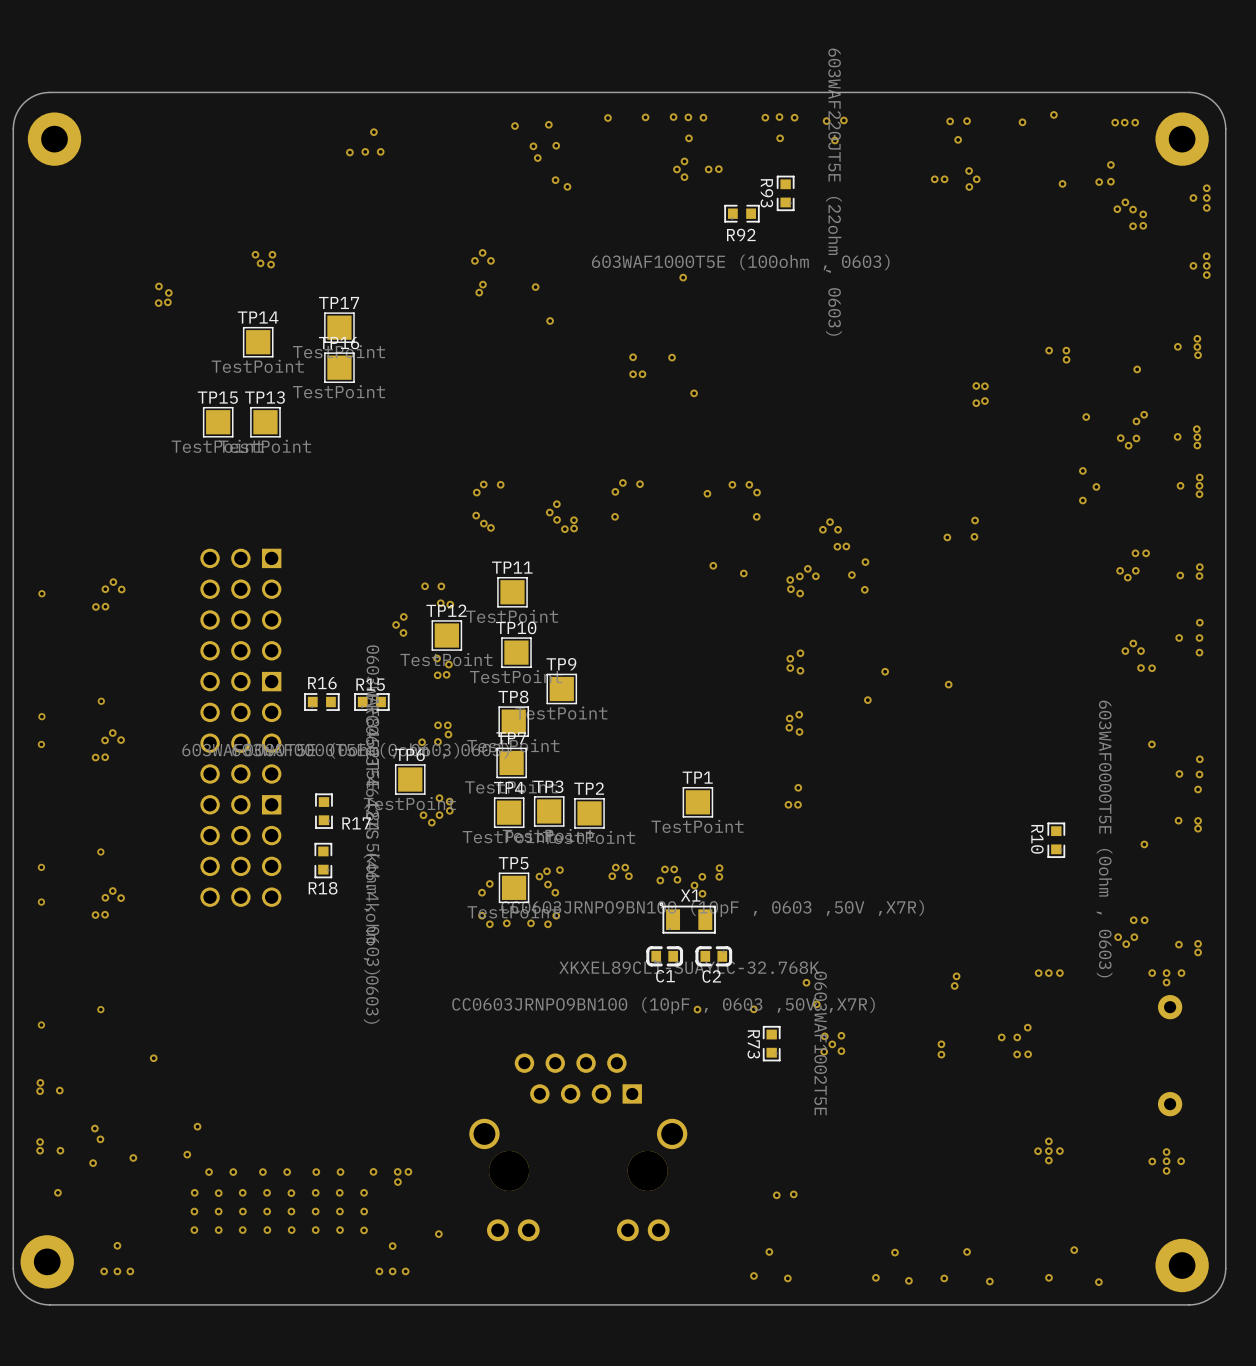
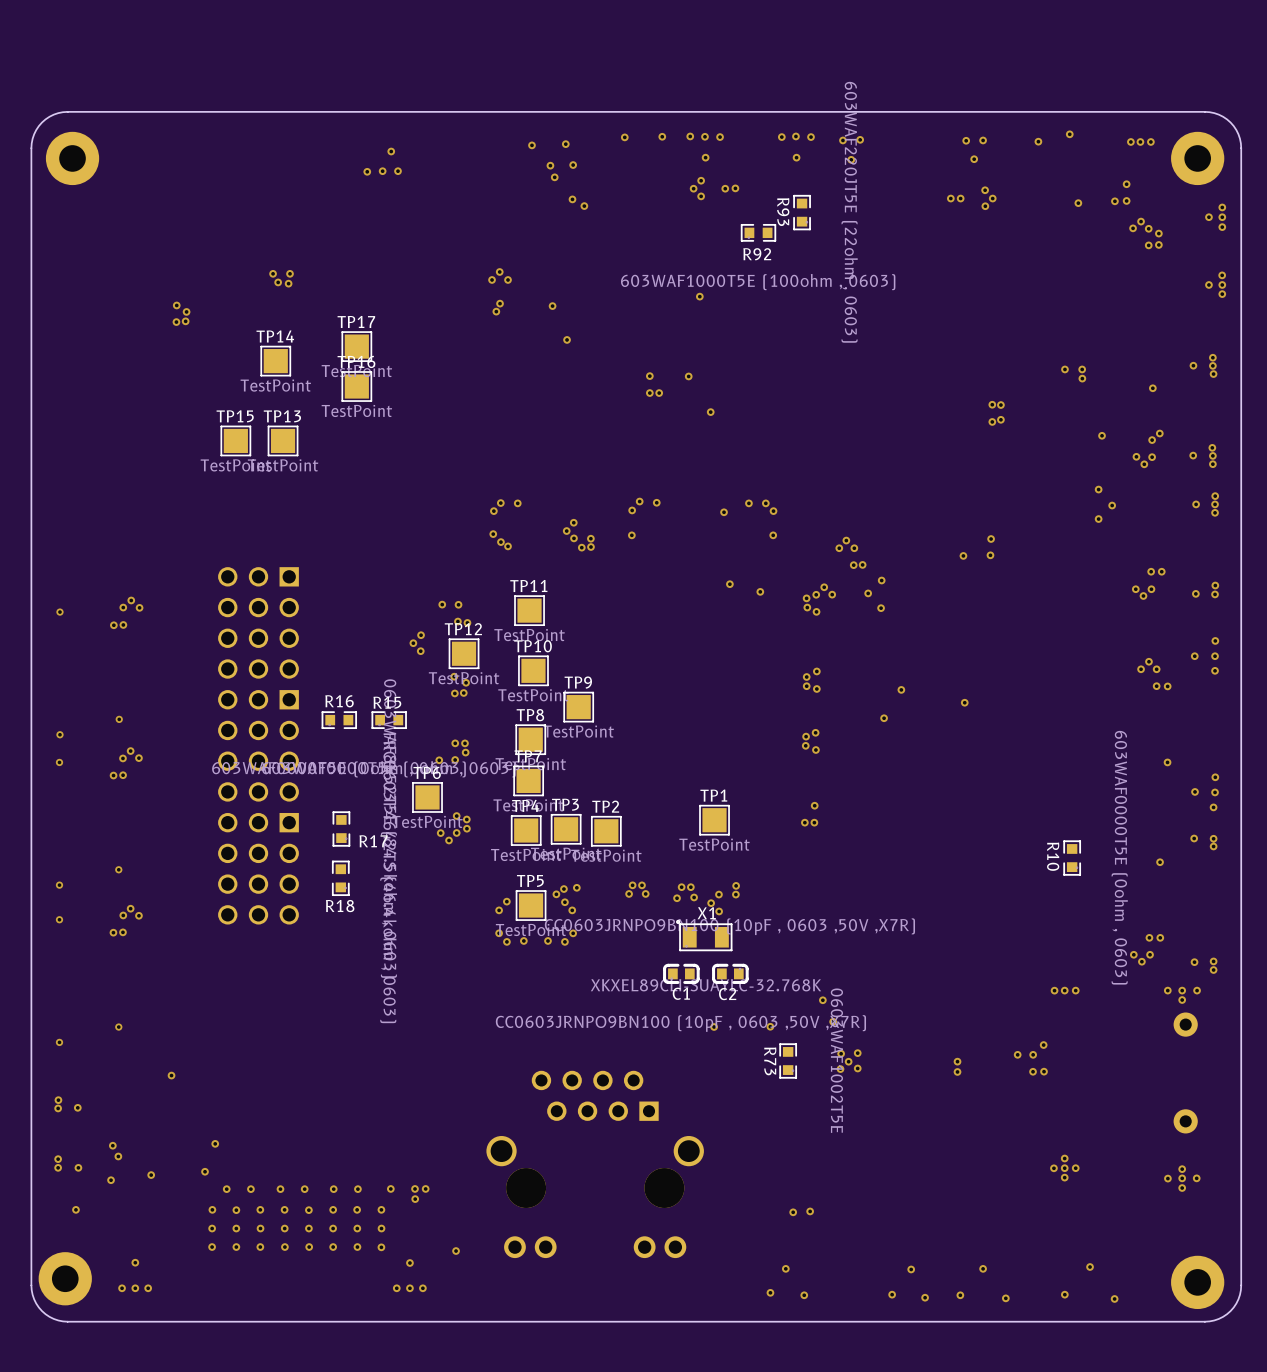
via: (956, 976) -> none
via: (954, 985) -> none

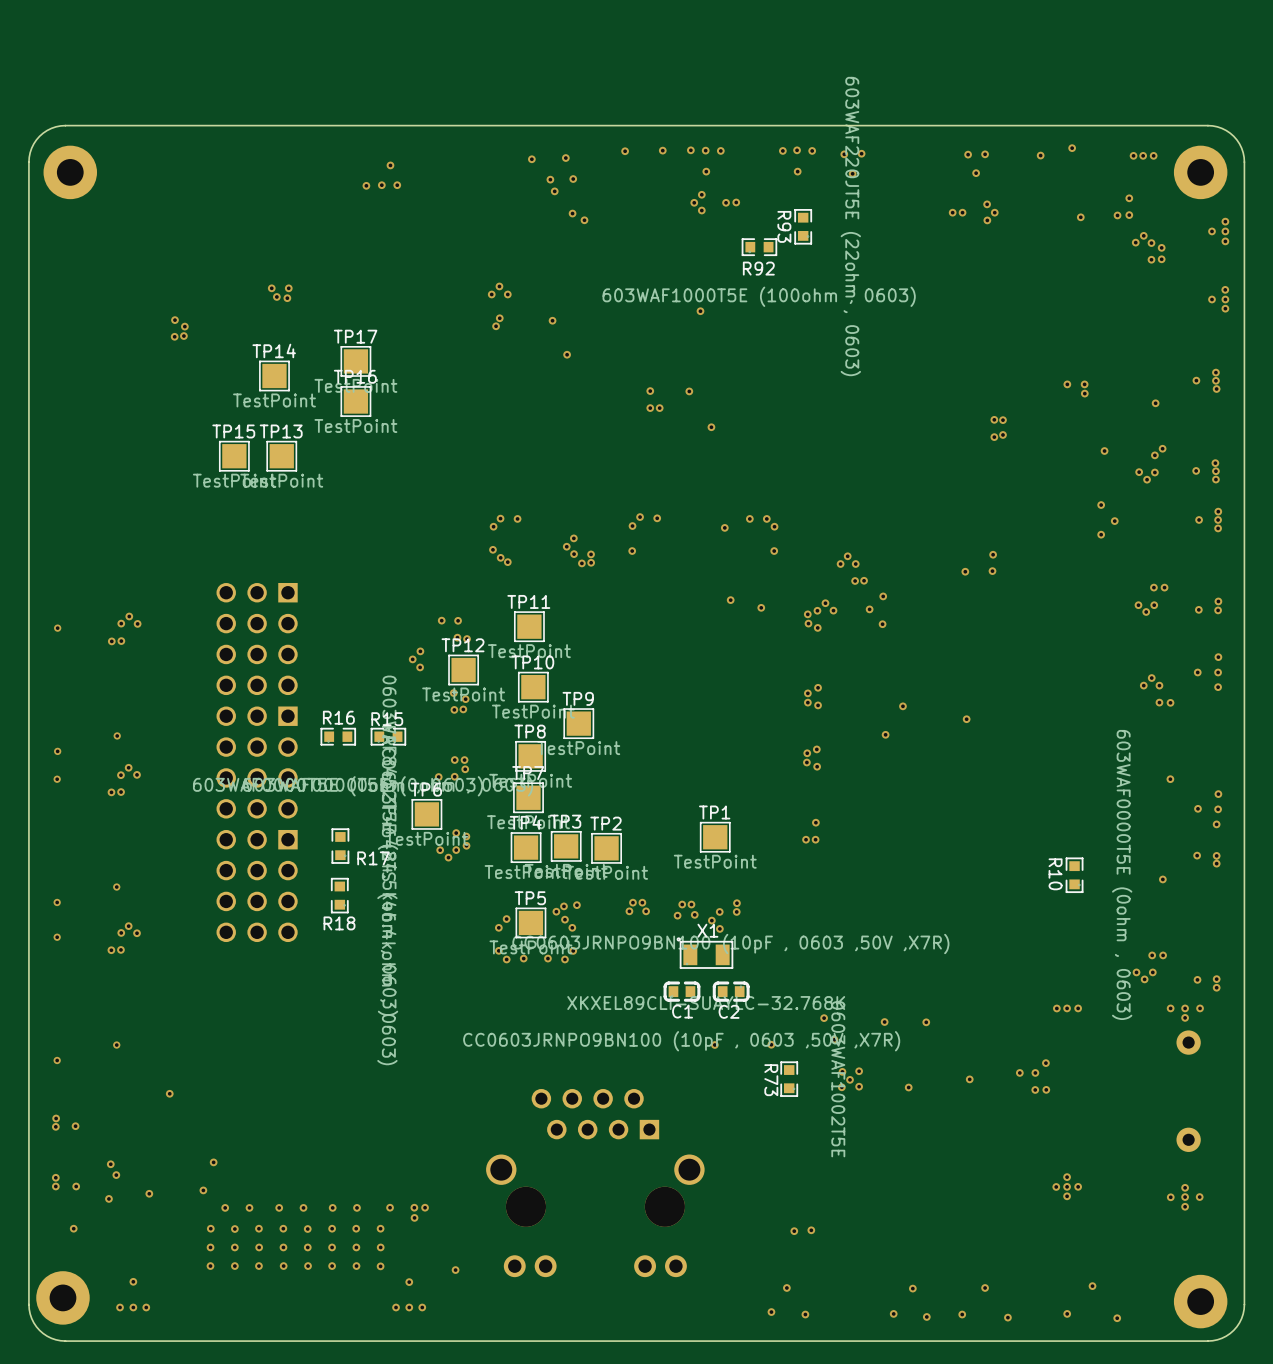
via: none -> (884, 1022)
via: none -> (926, 1022)
via: (957, 1061) -> none
via: none -> (969, 1079)
via: none -> (908, 1087)
via: (957, 1071) -> none

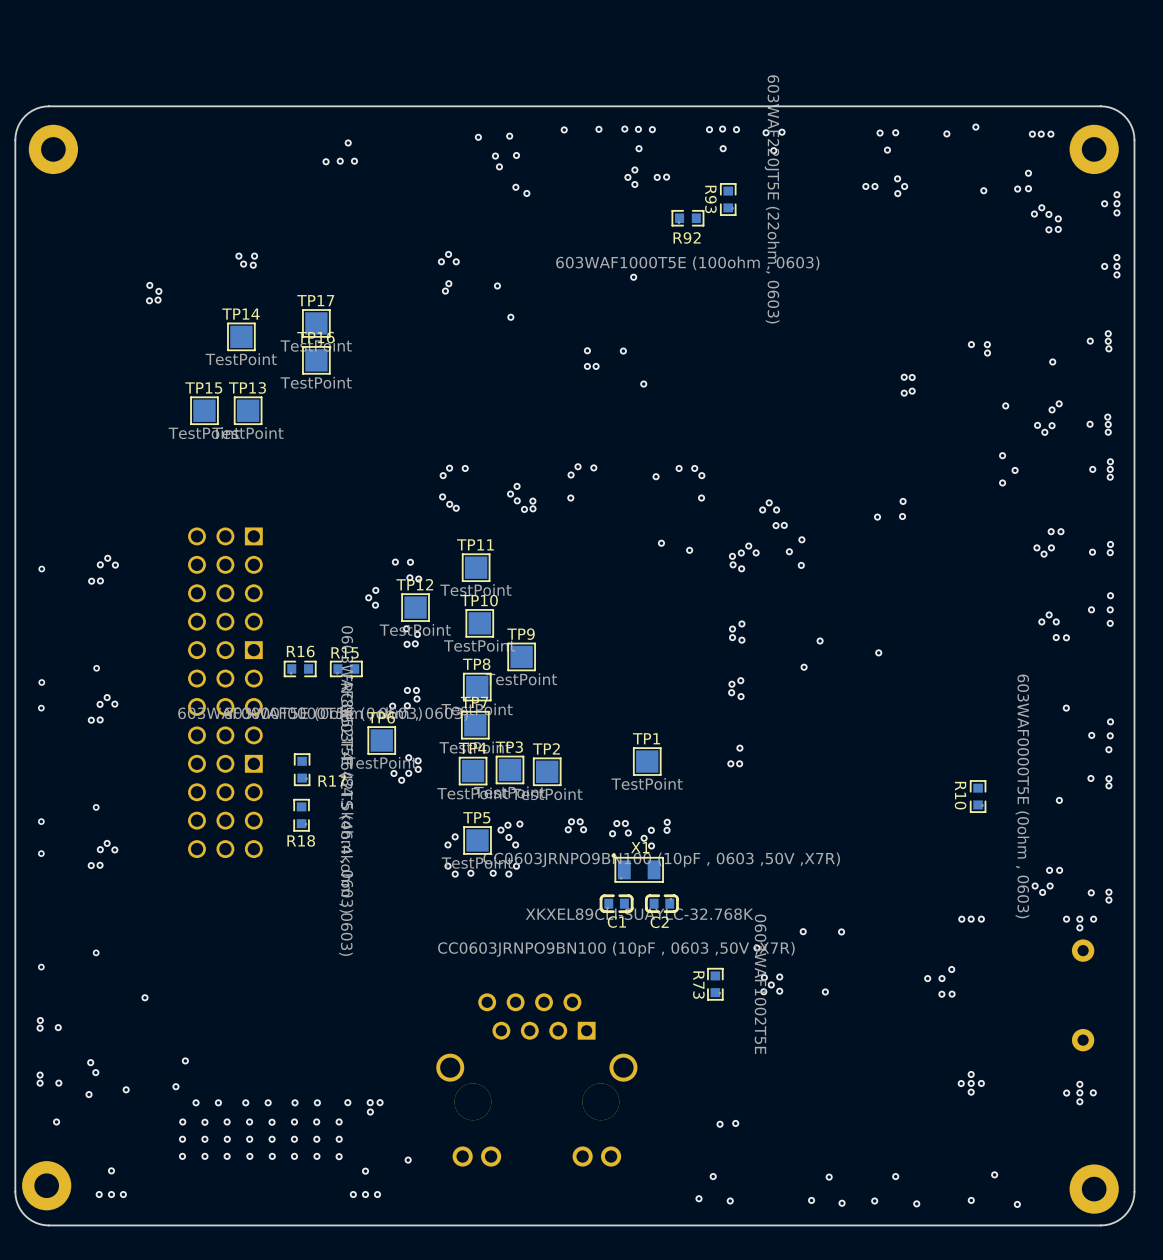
via: (824, 1018) -> none
via: (714, 1044) -> none
via: (771, 1044) -> none
via: (969, 1079) -> none

